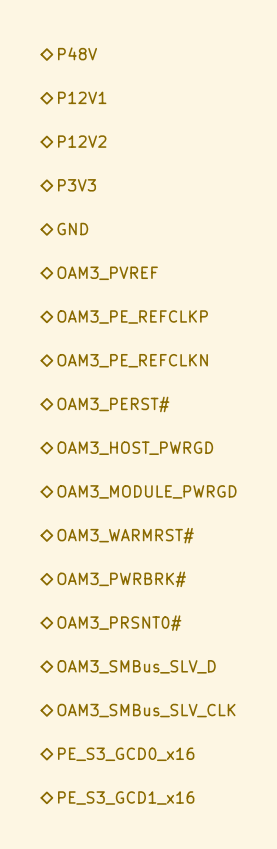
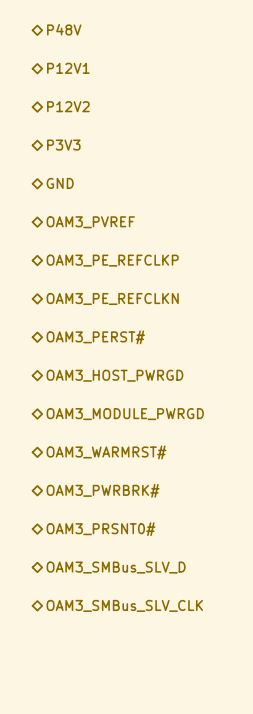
hierarchical label: PE_S3_GCD0_x16 (126, 754) -> none
hierarchical label: PE_S3_GCD1_x16 (126, 798) -> none

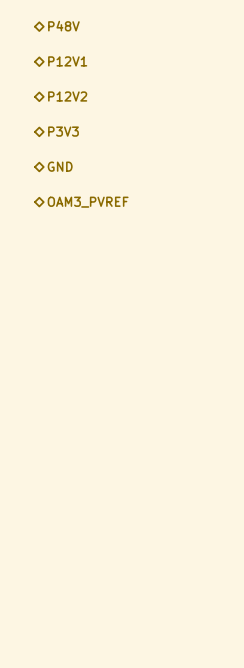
hierarchical label: OAM3_PE_REFCLKP (112, 260) -> none
hierarchical label: OAM3_PE_REFCLKN (112, 298) -> none
hierarchical label: OAM3_PERST# (95, 337) -> none
hierarchical label: OAM3_HOST_PWRGD (114, 375) -> none
hierarchical label: OAM3_MODULE_PWRGD (125, 414) -> none
hierarchical label: OAM3_WARMRST# (106, 452) -> none
hierarchical label: OAM3_PWRBRK# (103, 490) -> none
hierarchical label: OAM3_PRSNT0# (101, 529) -> none
hierarchical label: OAM3_SMBus_SLV_D (116, 567) -> none
hierarchical label: OAM3_SMBus_SLV_CLK (124, 605) -> none

